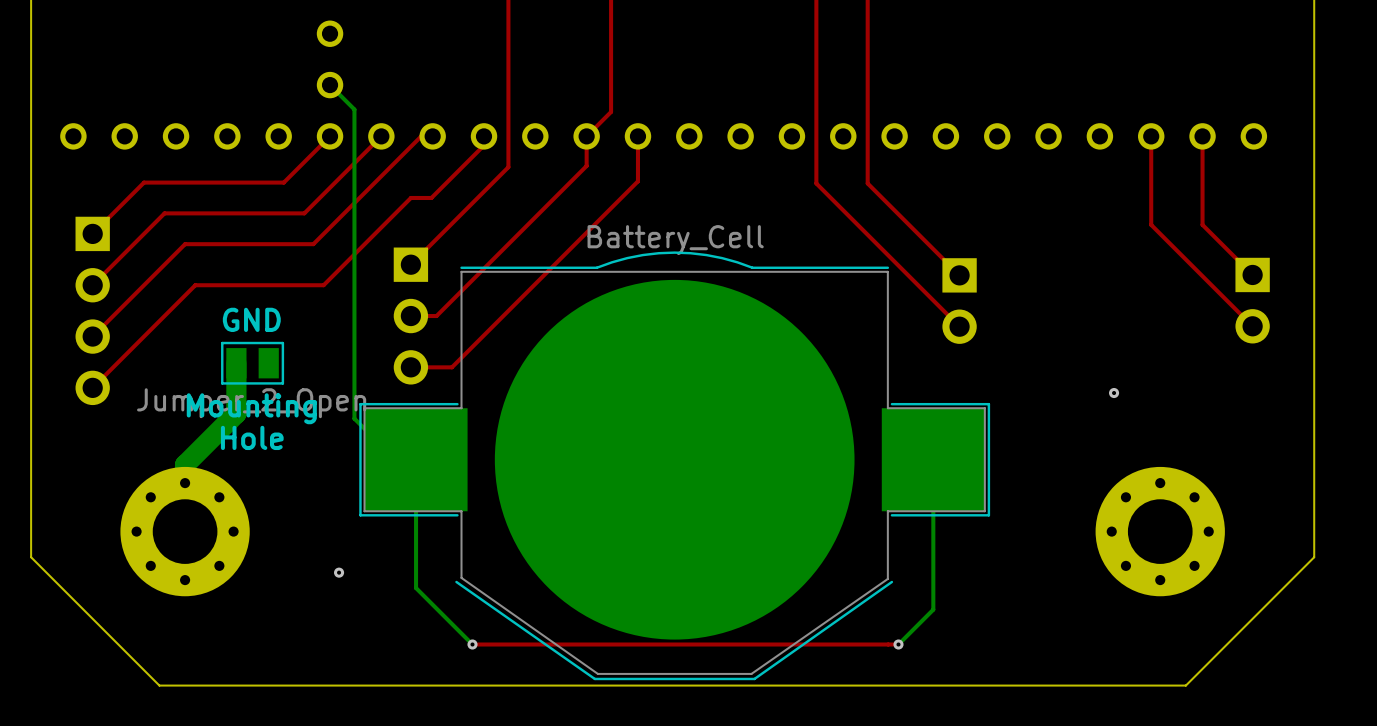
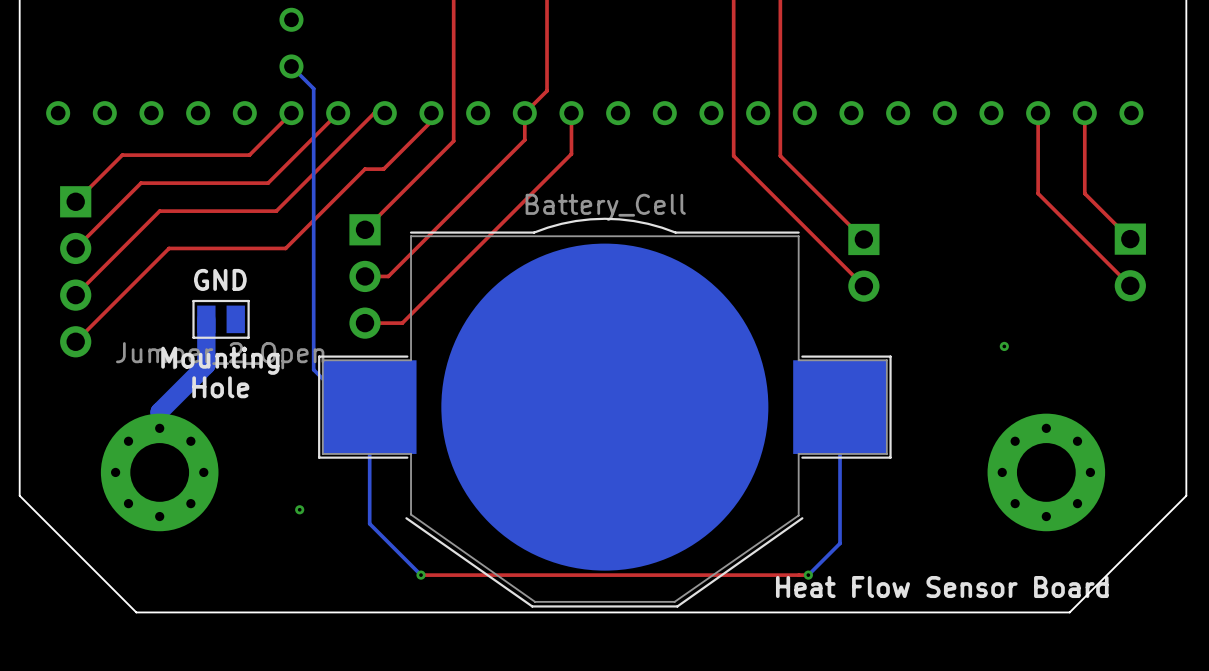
text: none -> Heat Flow Sensor Board (942, 587)

